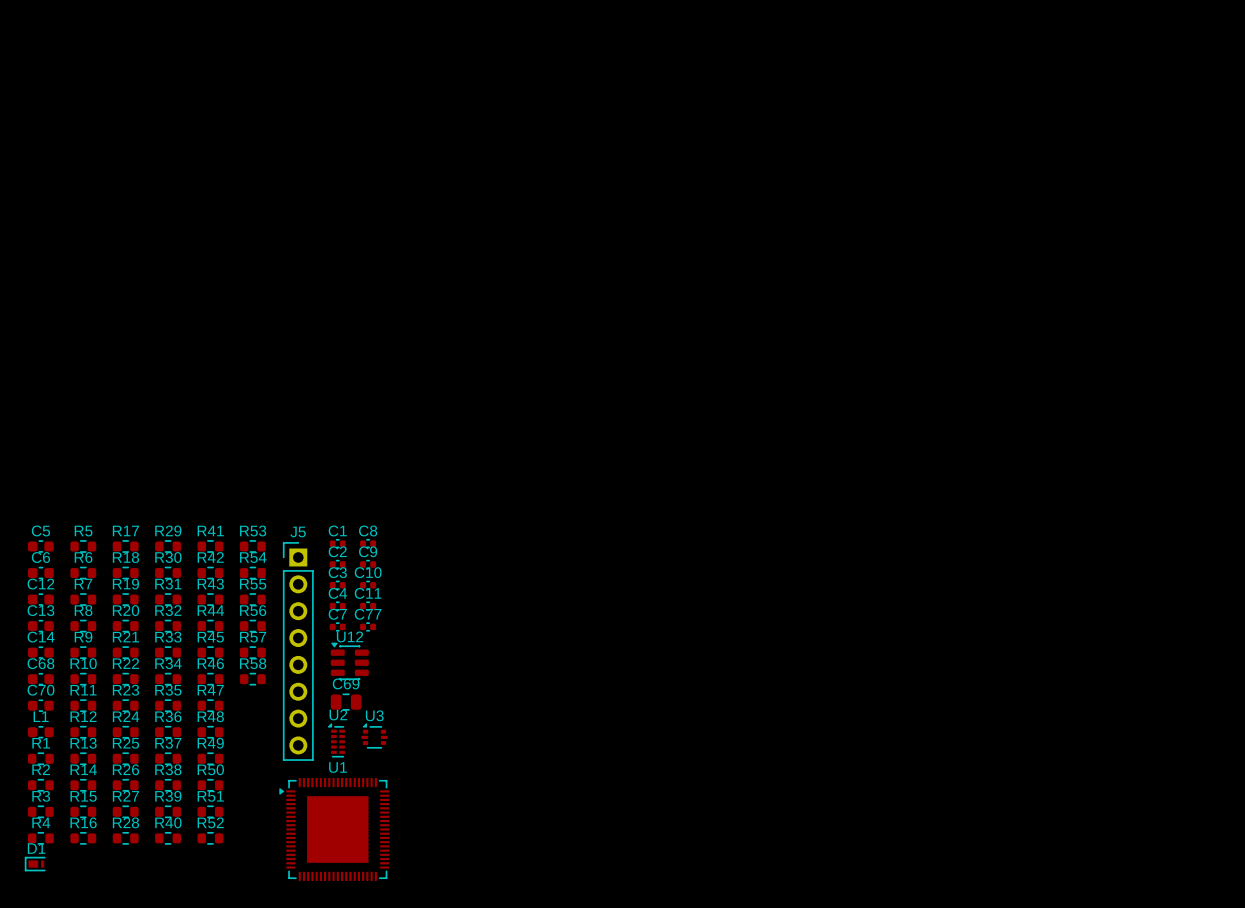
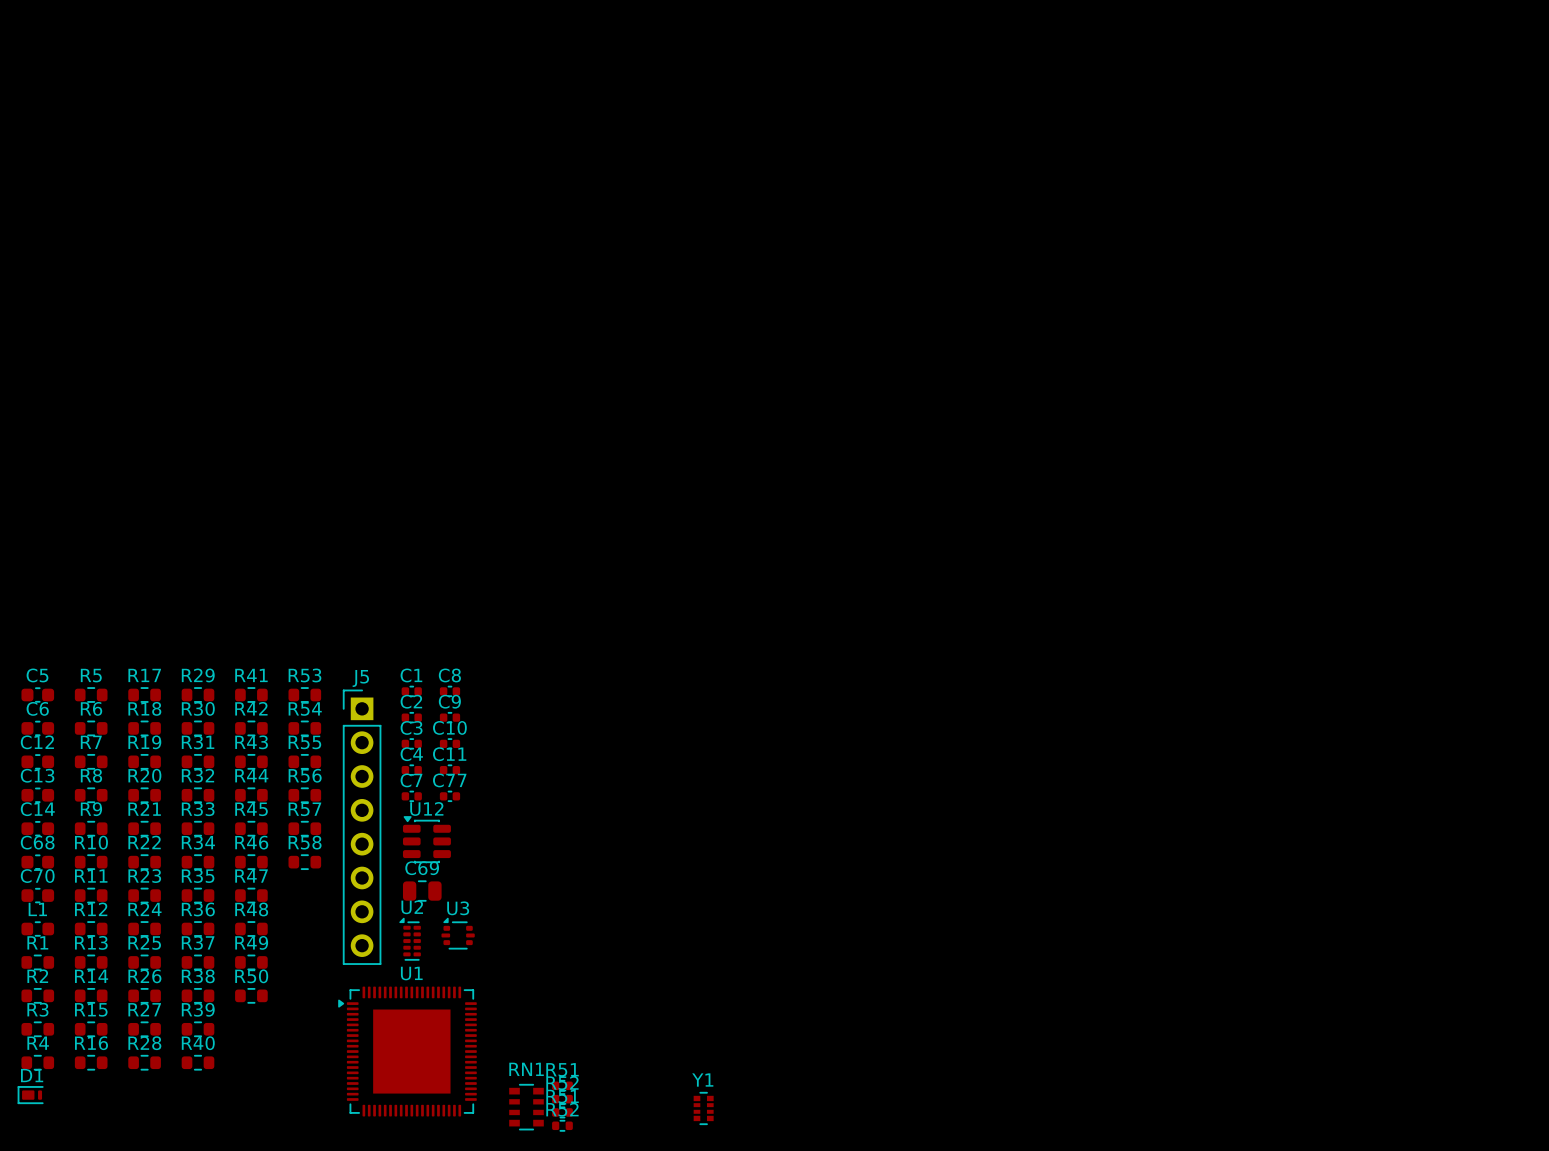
R51: (210, 811) -> none
R52: (210, 838) -> none
R51: none -> (562, 1085)
R52: none -> (562, 1099)
RN1: none -> (526, 1107)
Y1: none -> (703, 1108)
R51: none -> (562, 1112)
R52: none -> (562, 1125)

